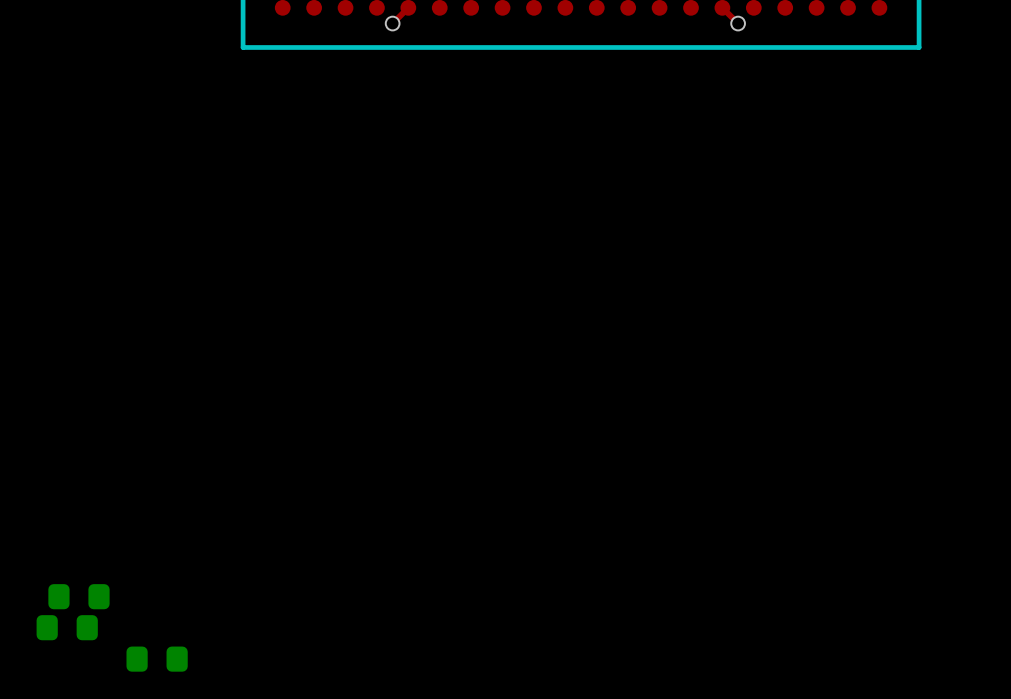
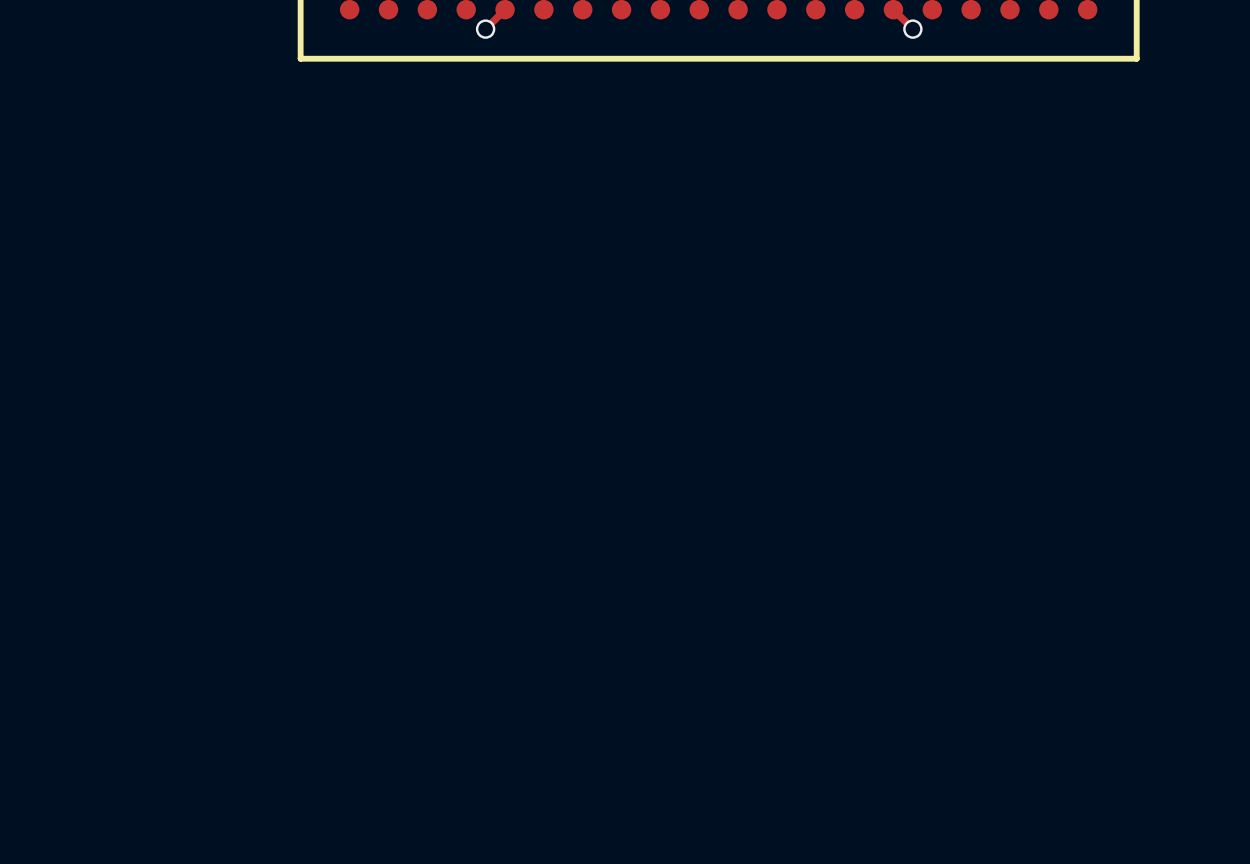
part: (78, 596) -> none
part: (67, 627) -> none
part: (157, 659) -> none

